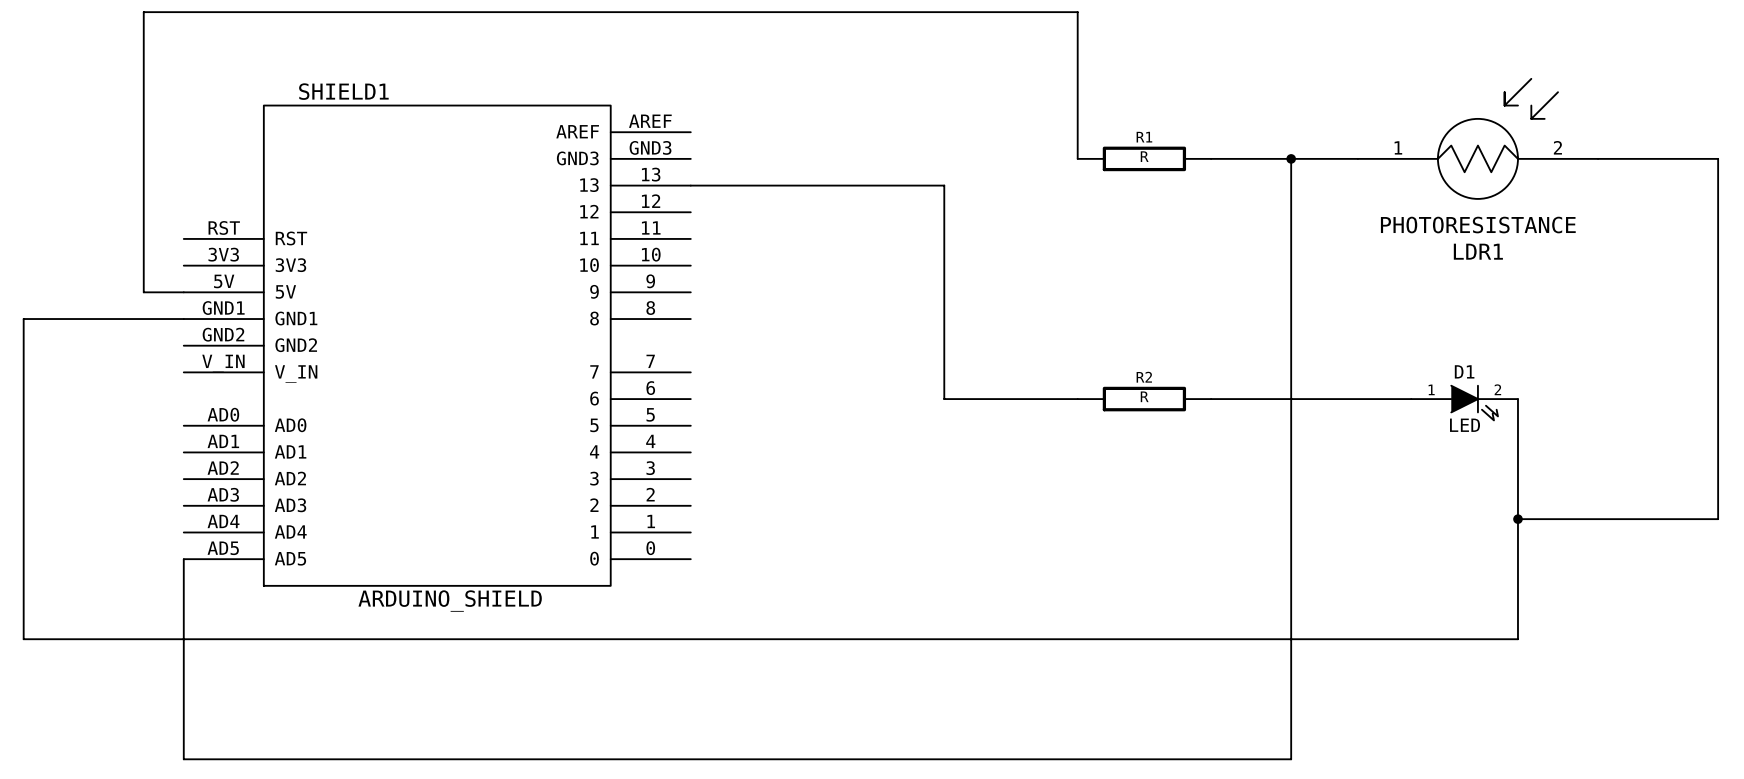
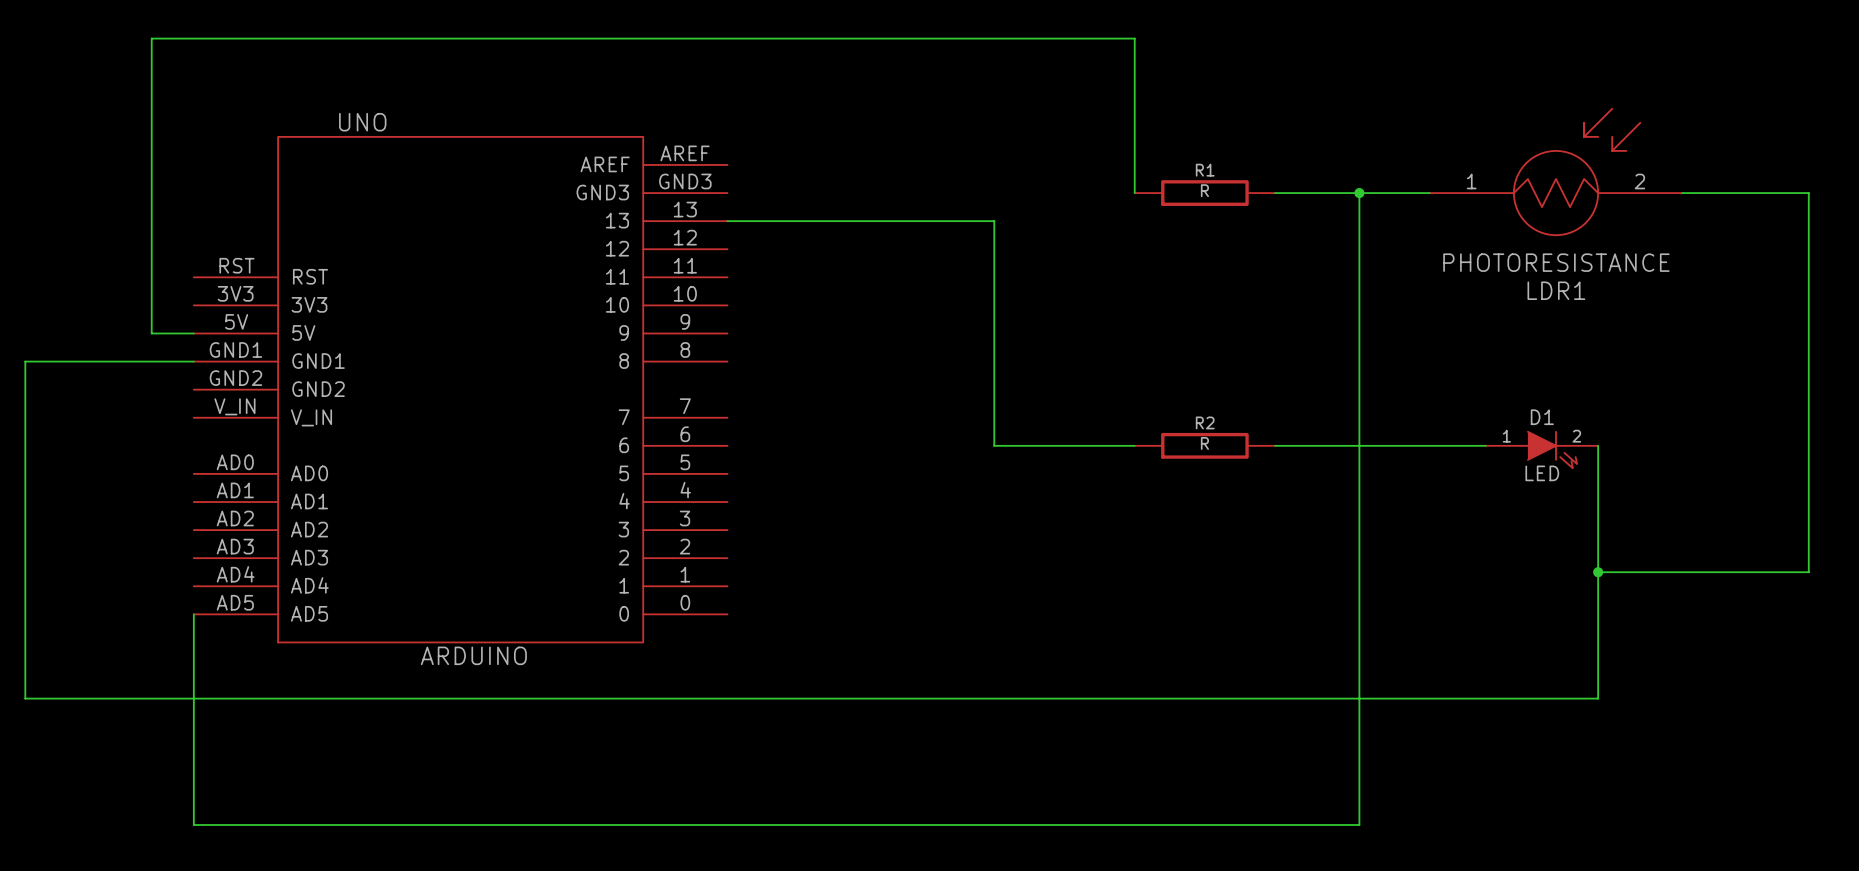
SHIELD1 name: SHIELD1 (343, 91) -> UNO (362, 122)
SHIELD1 value: ARDUINO_SHIELD (450, 601) -> ARDUINO (473, 655)

